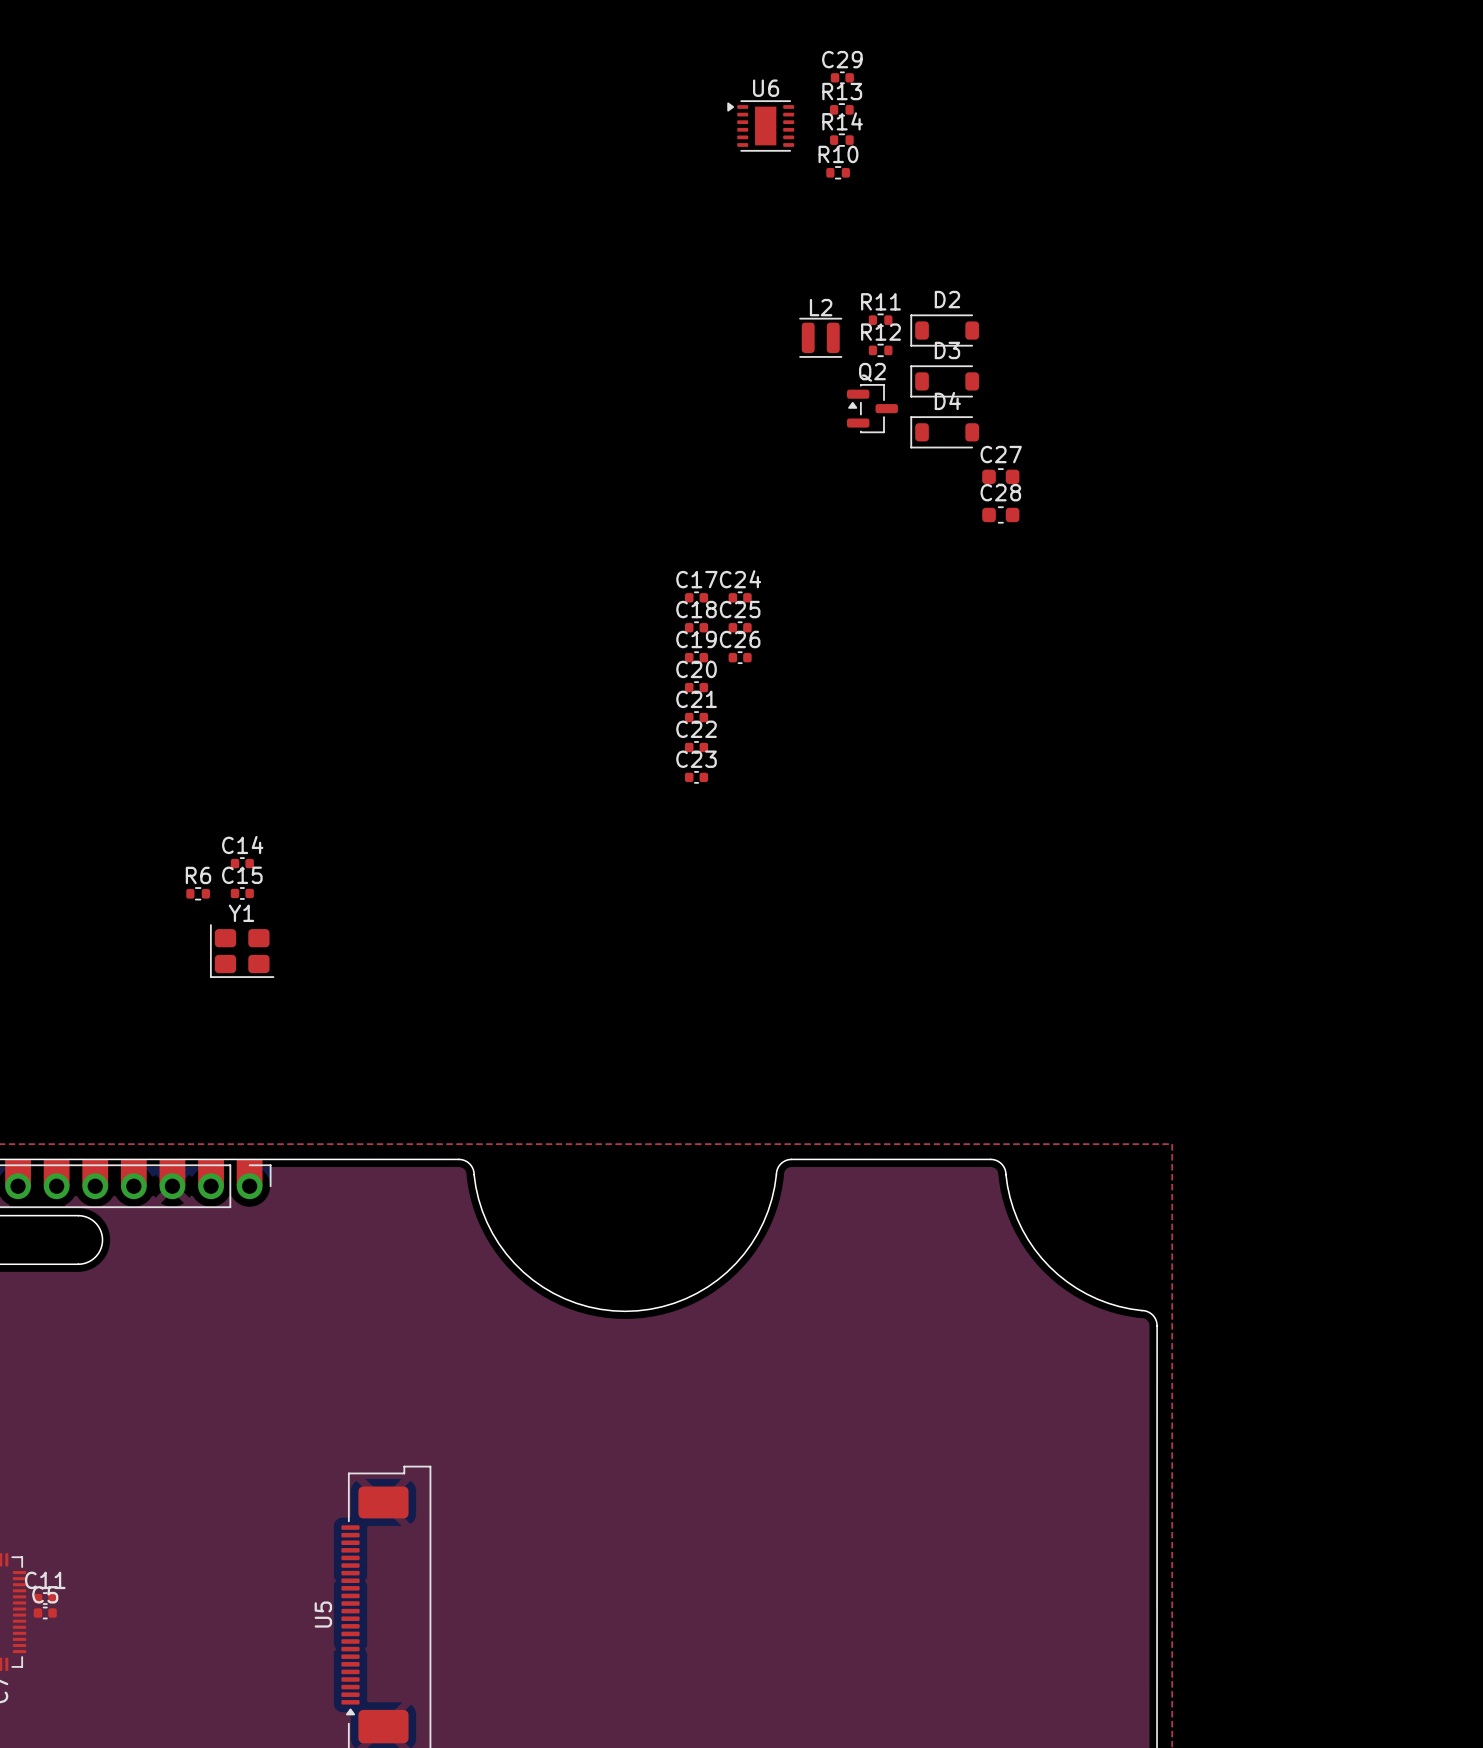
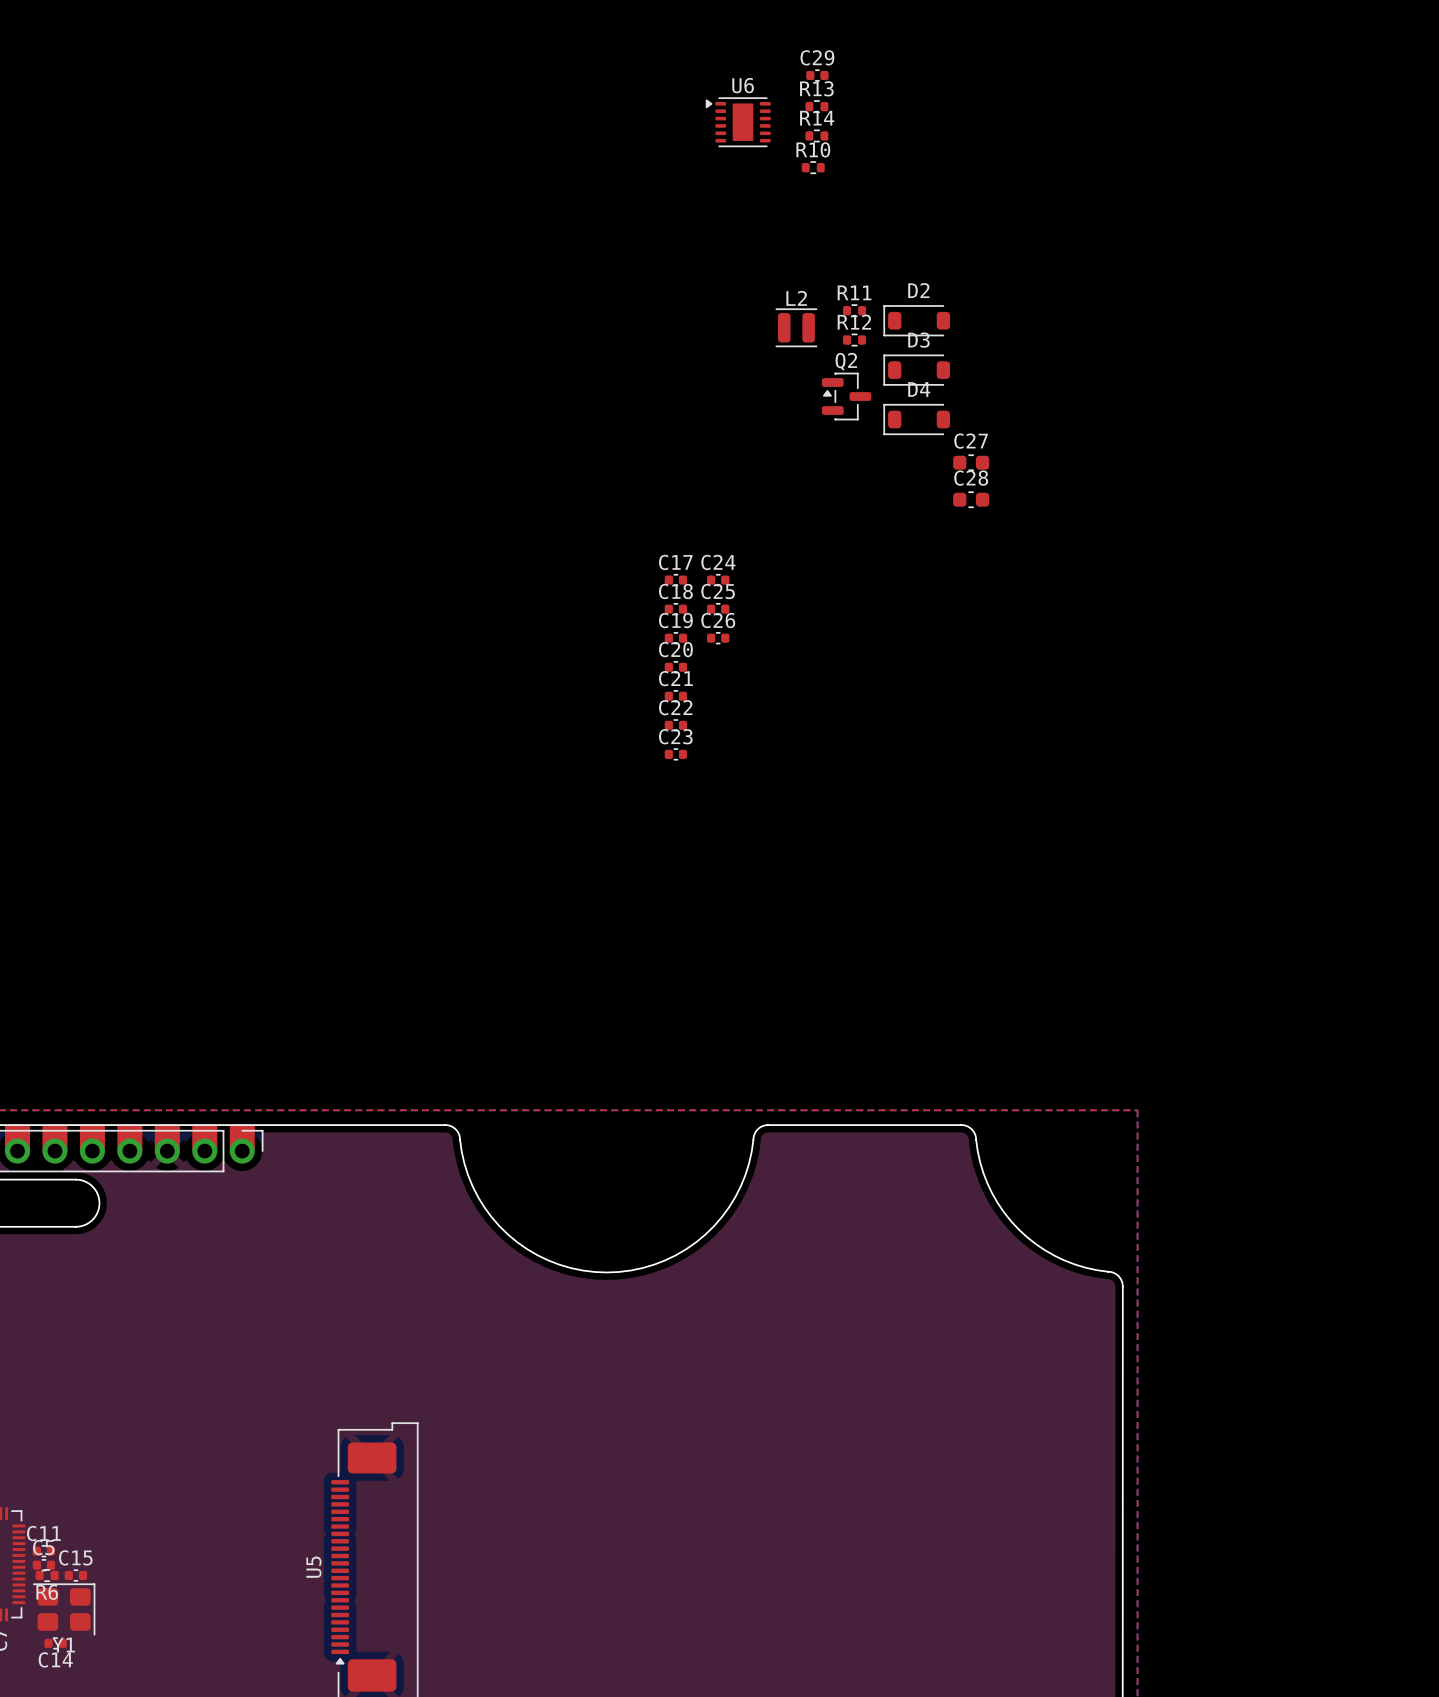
C14 name position: C14 (242, 845) -> C14 (55, 1659)
C14 position: (242, 863) -> (55, 1643)
R6 name position: R6 (198, 875) -> R6 (47, 1592)
R6 position: (198, 893) -> (47, 1575)
C15 position: (242, 893) -> (75, 1575)
Y1 rotation: 0° (242, 951) -> 180° (64, 1609)
Y1 position: (242, 951) -> (64, 1609)

